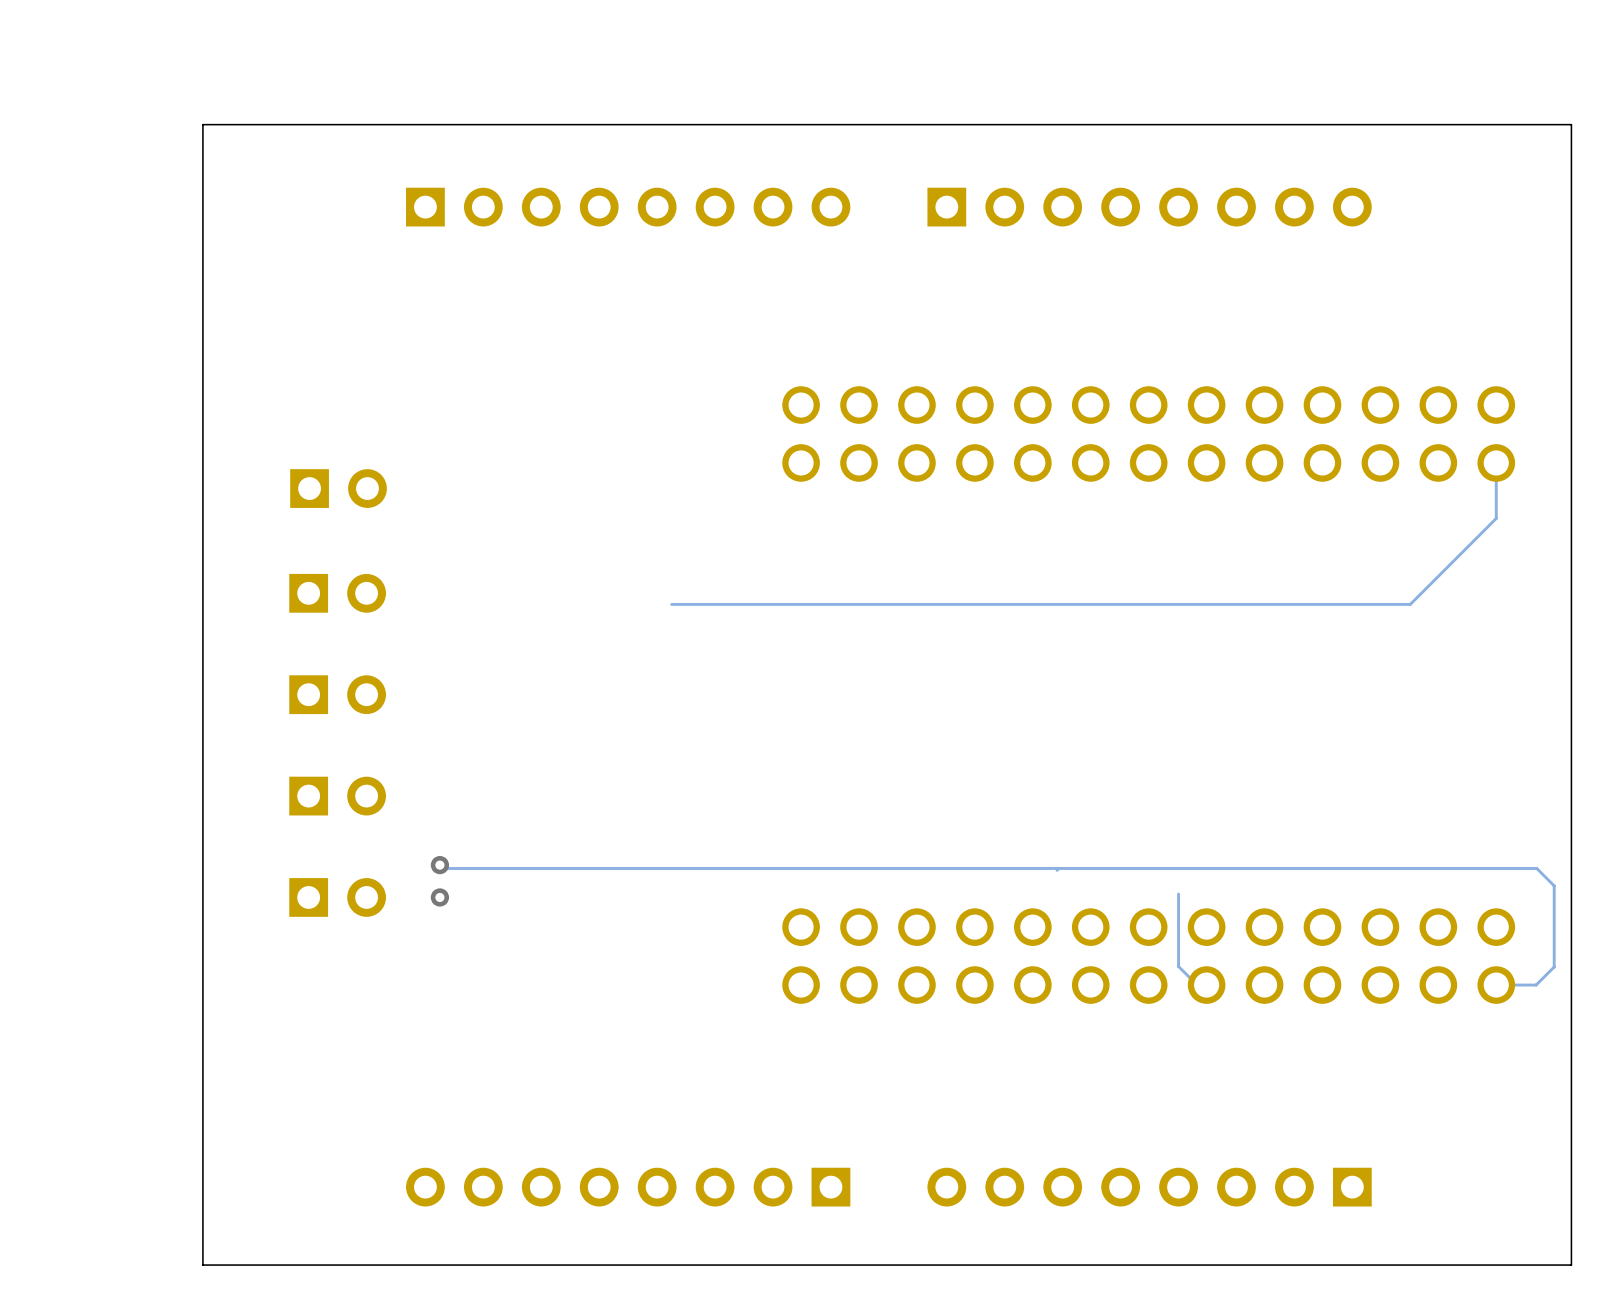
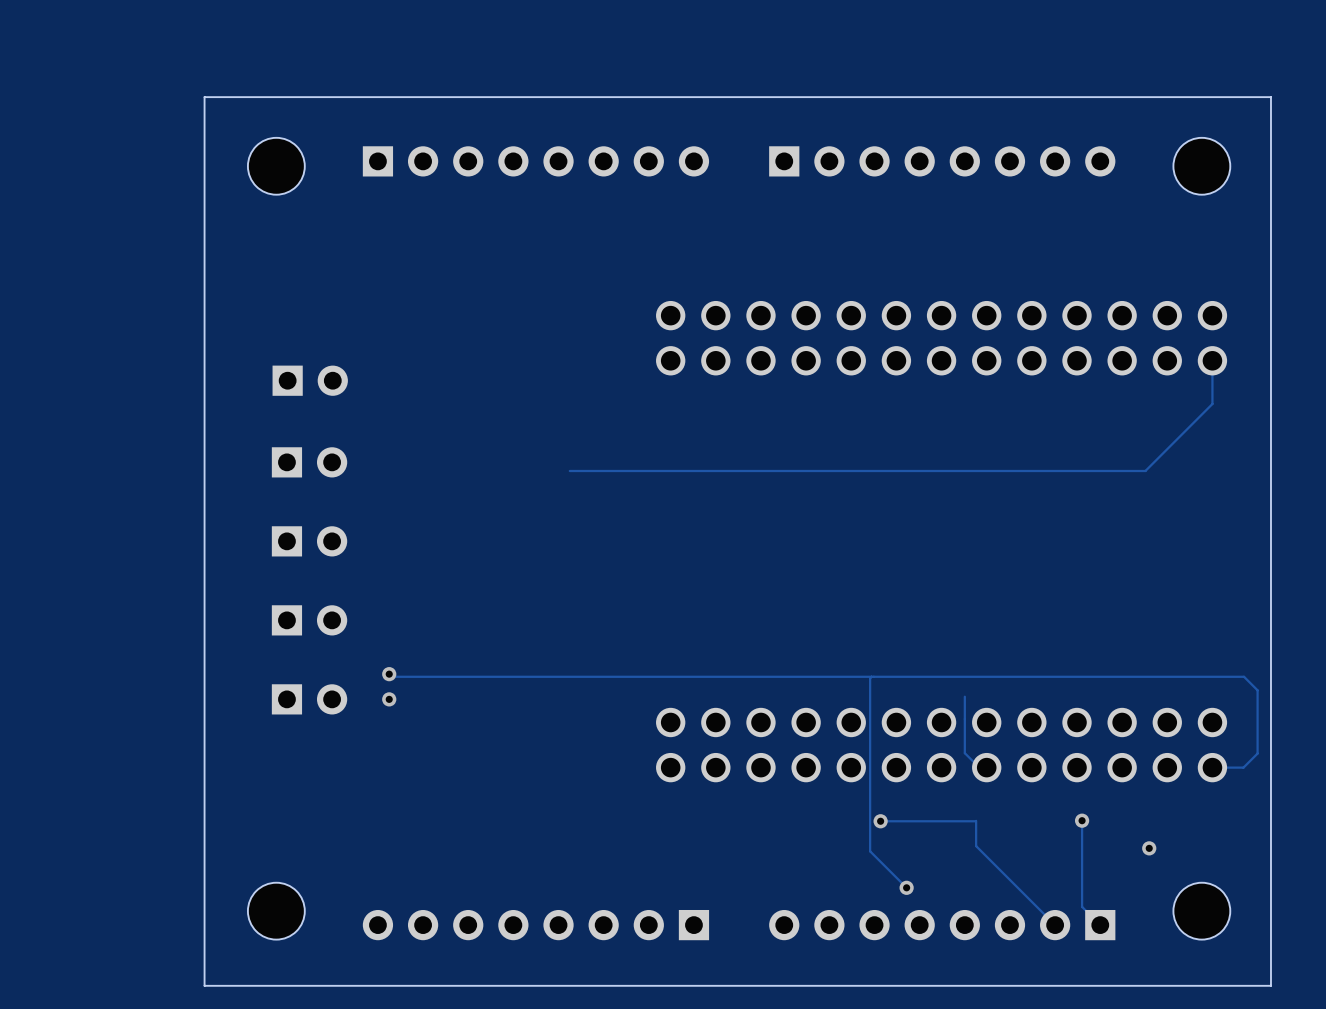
part: none -> (276, 166)
part: none -> (1201, 166)
track: none -> (870, 678) (870, 851) (906, 887)
via: none -> (880, 821)
track: none -> (975, 821) (880, 821)
track: none -> (976, 820) (976, 846) (1055, 925)
track: none -> (1082, 820) (1082, 906) (1100, 925)
via: none -> (1082, 820)
via: none -> (1149, 848)
via: none -> (906, 887)
part: none -> (276, 911)
part: none -> (1201, 911)

